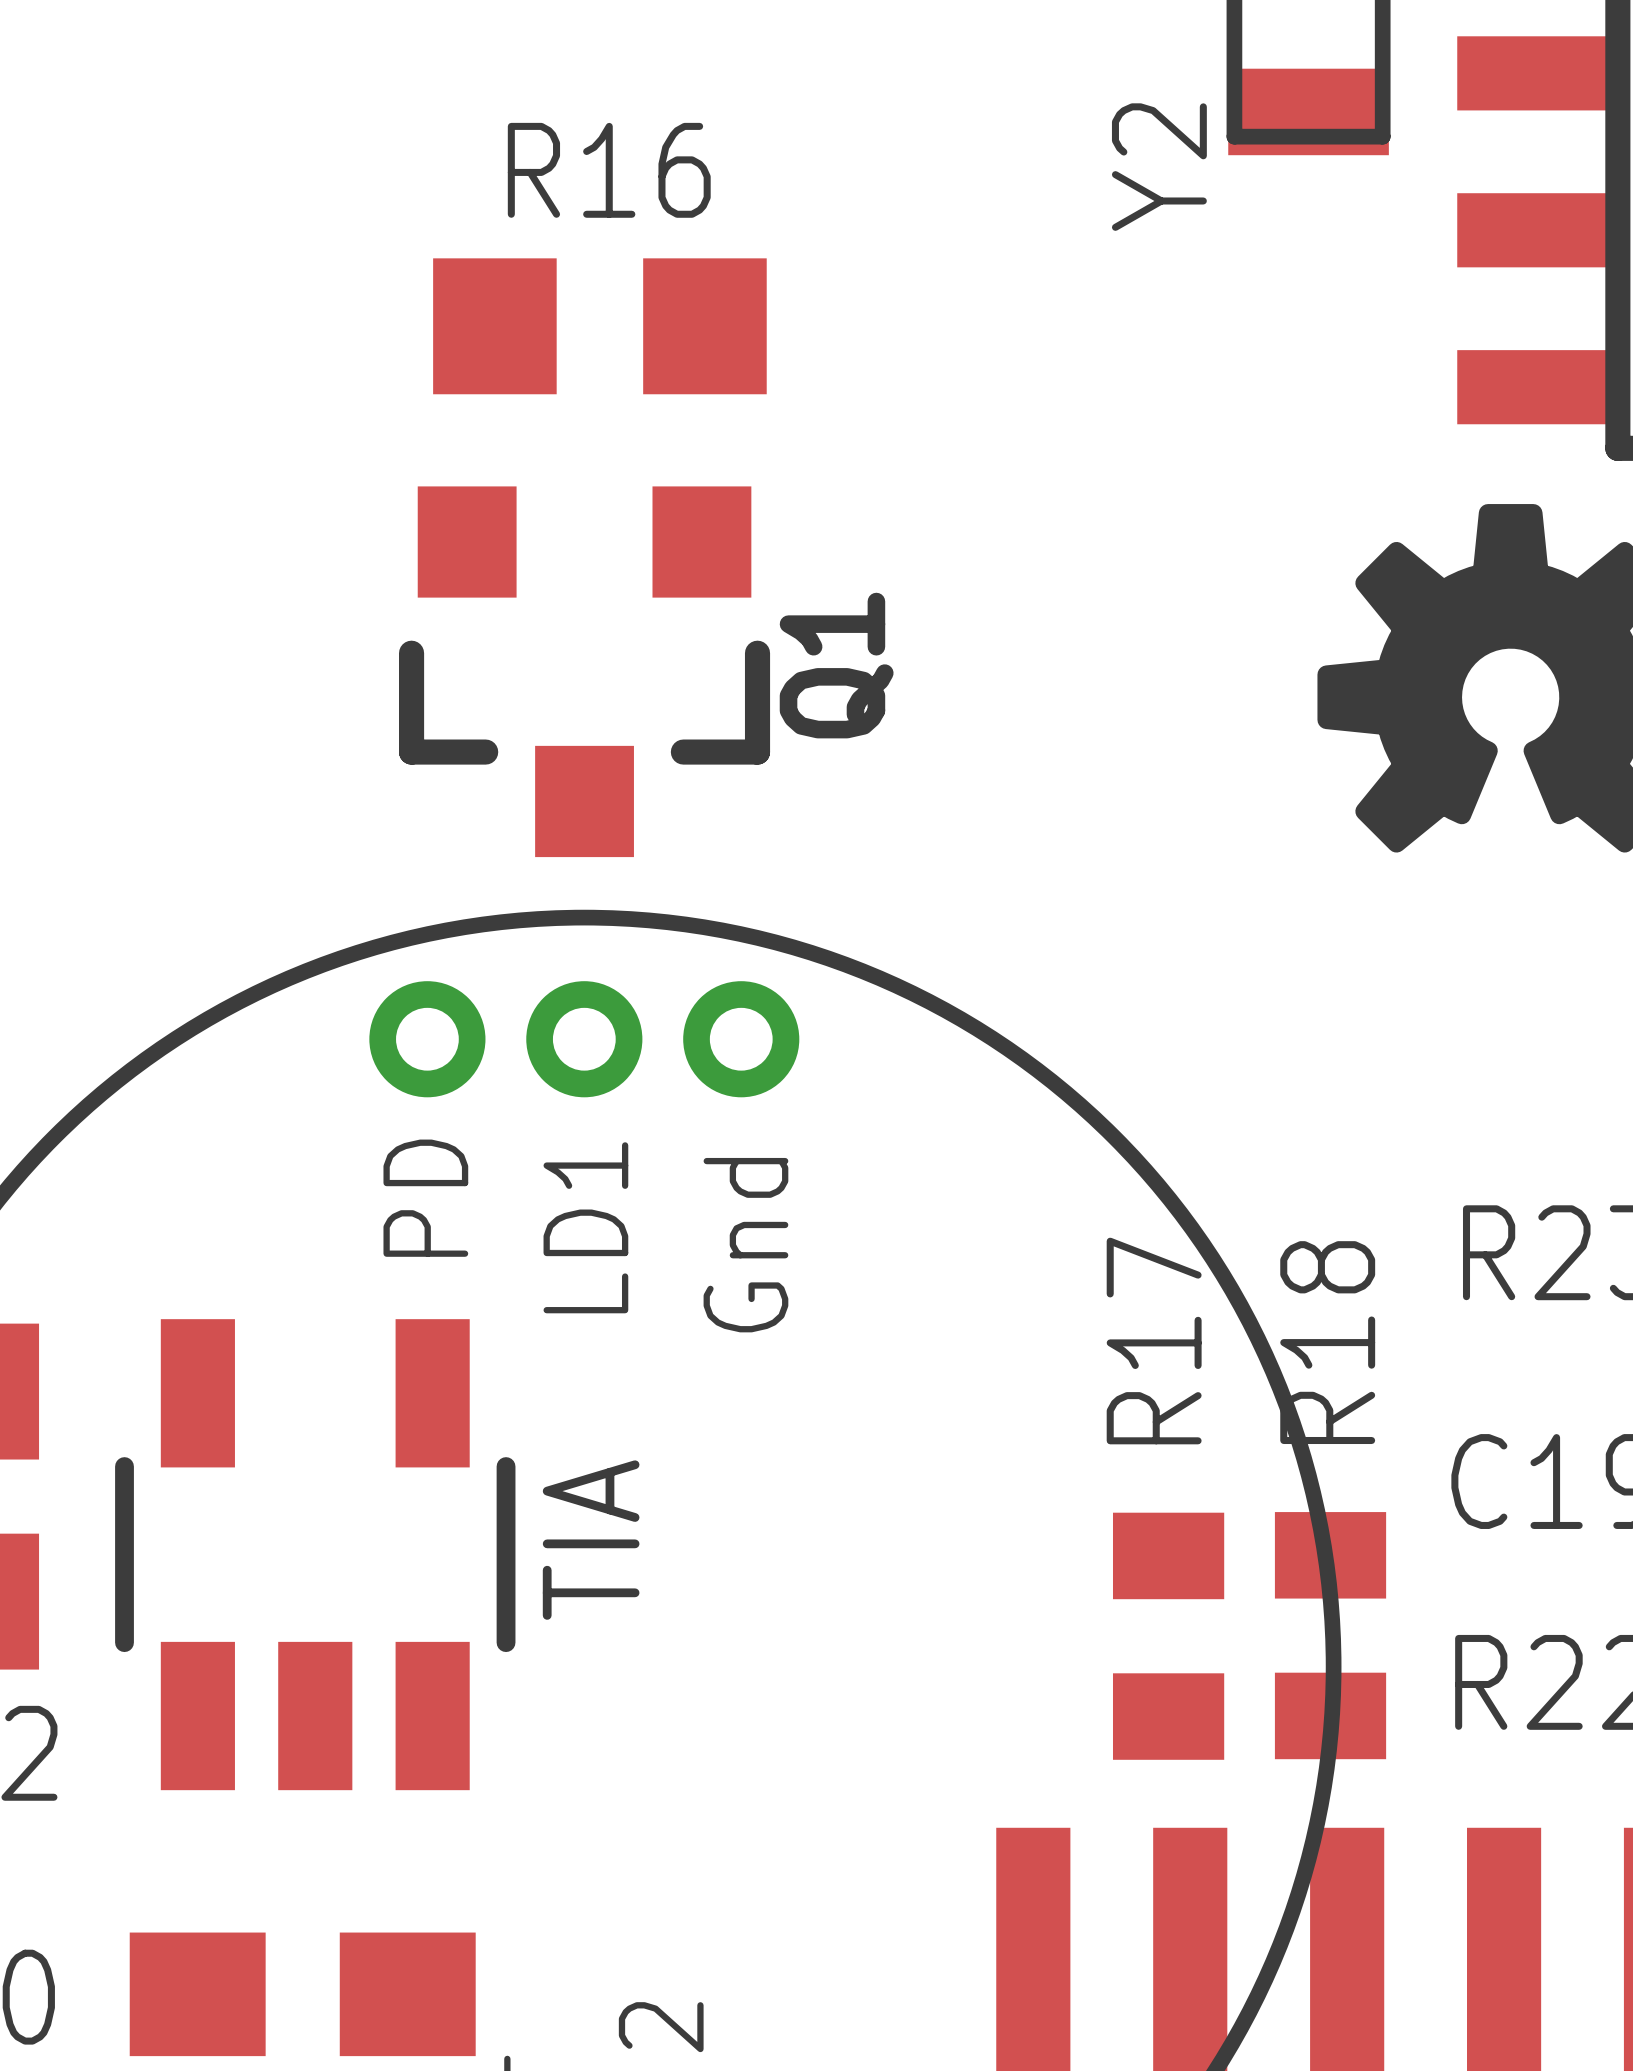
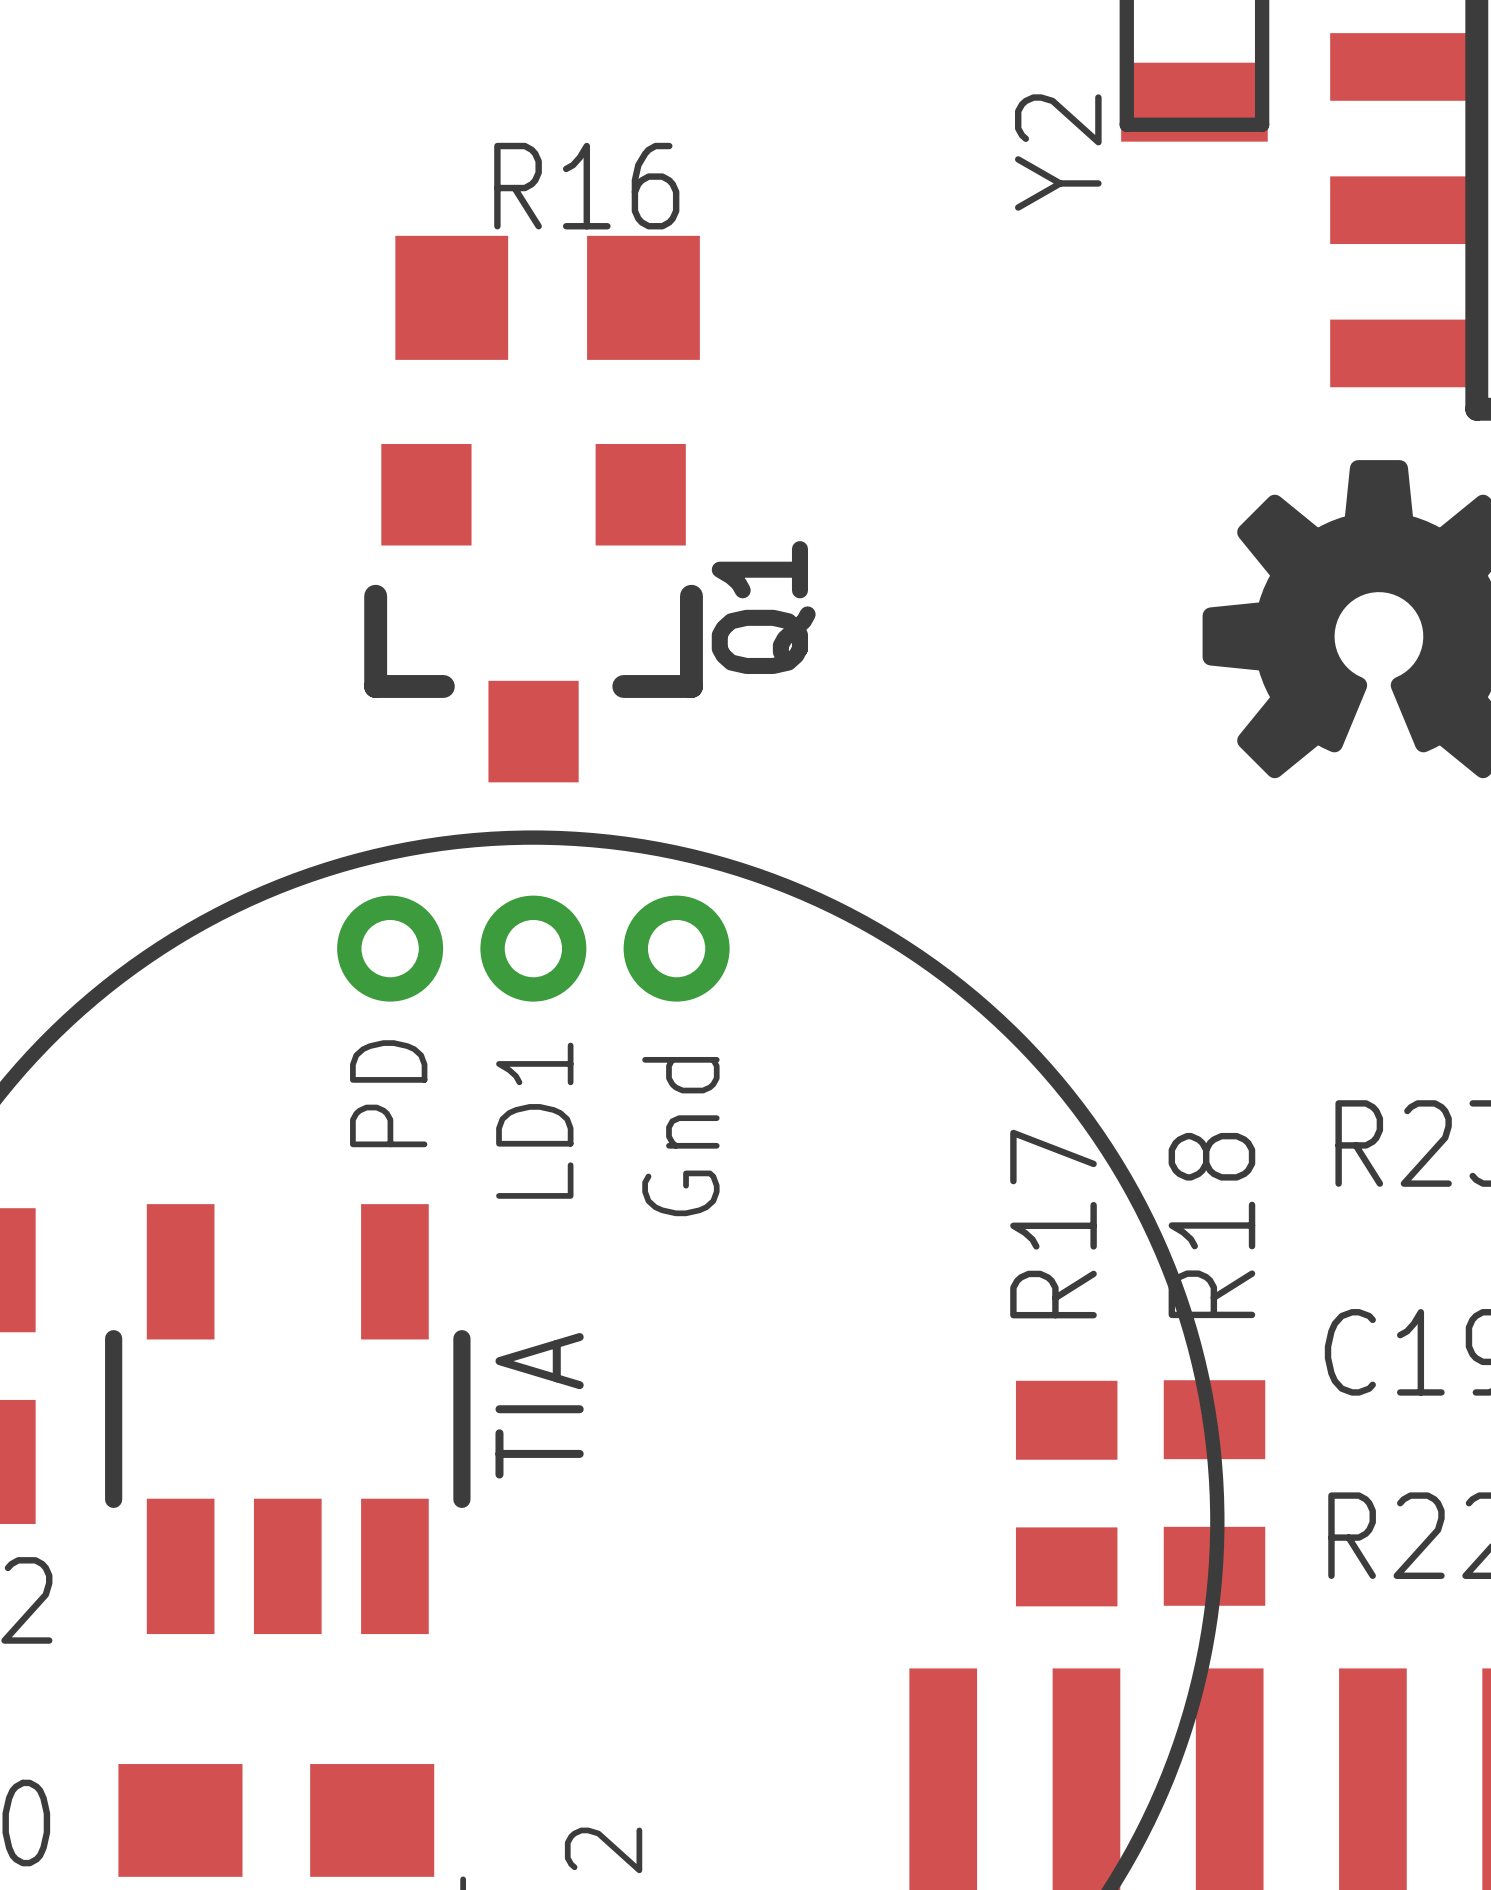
R16 name position: R16 (609, 170) -> R16 (586, 186)

